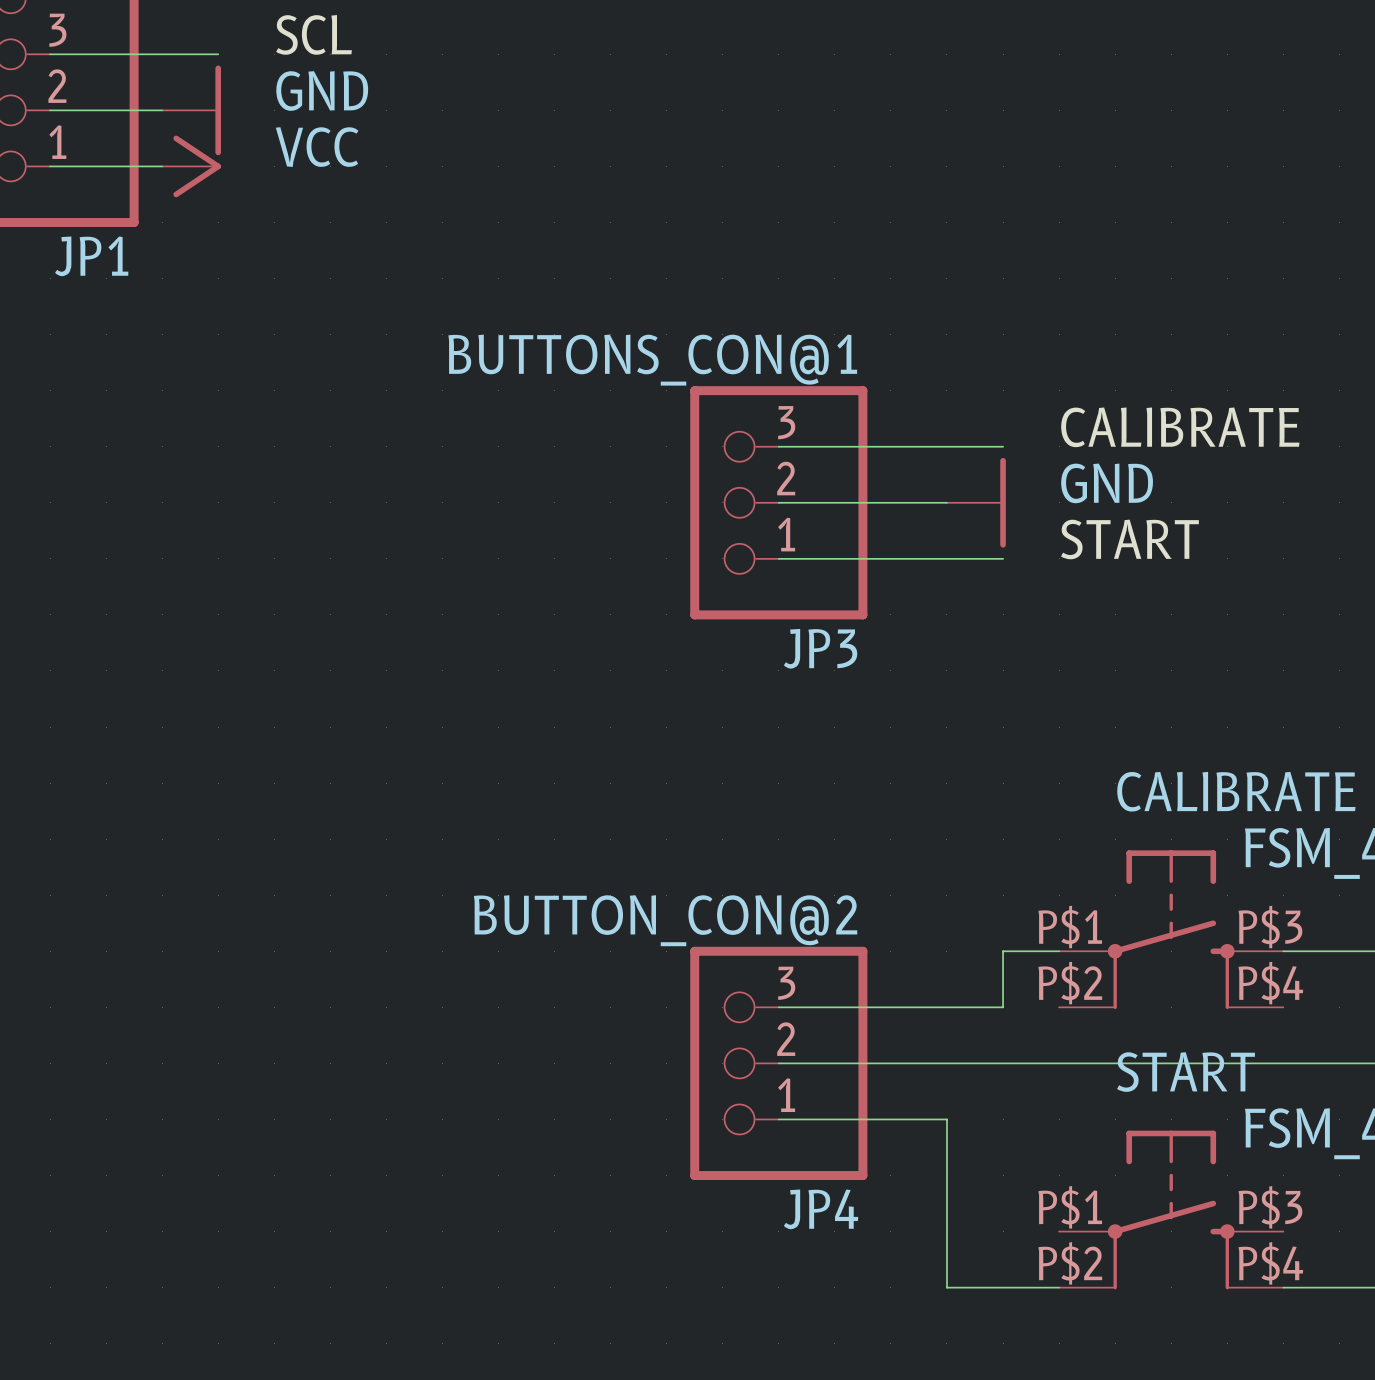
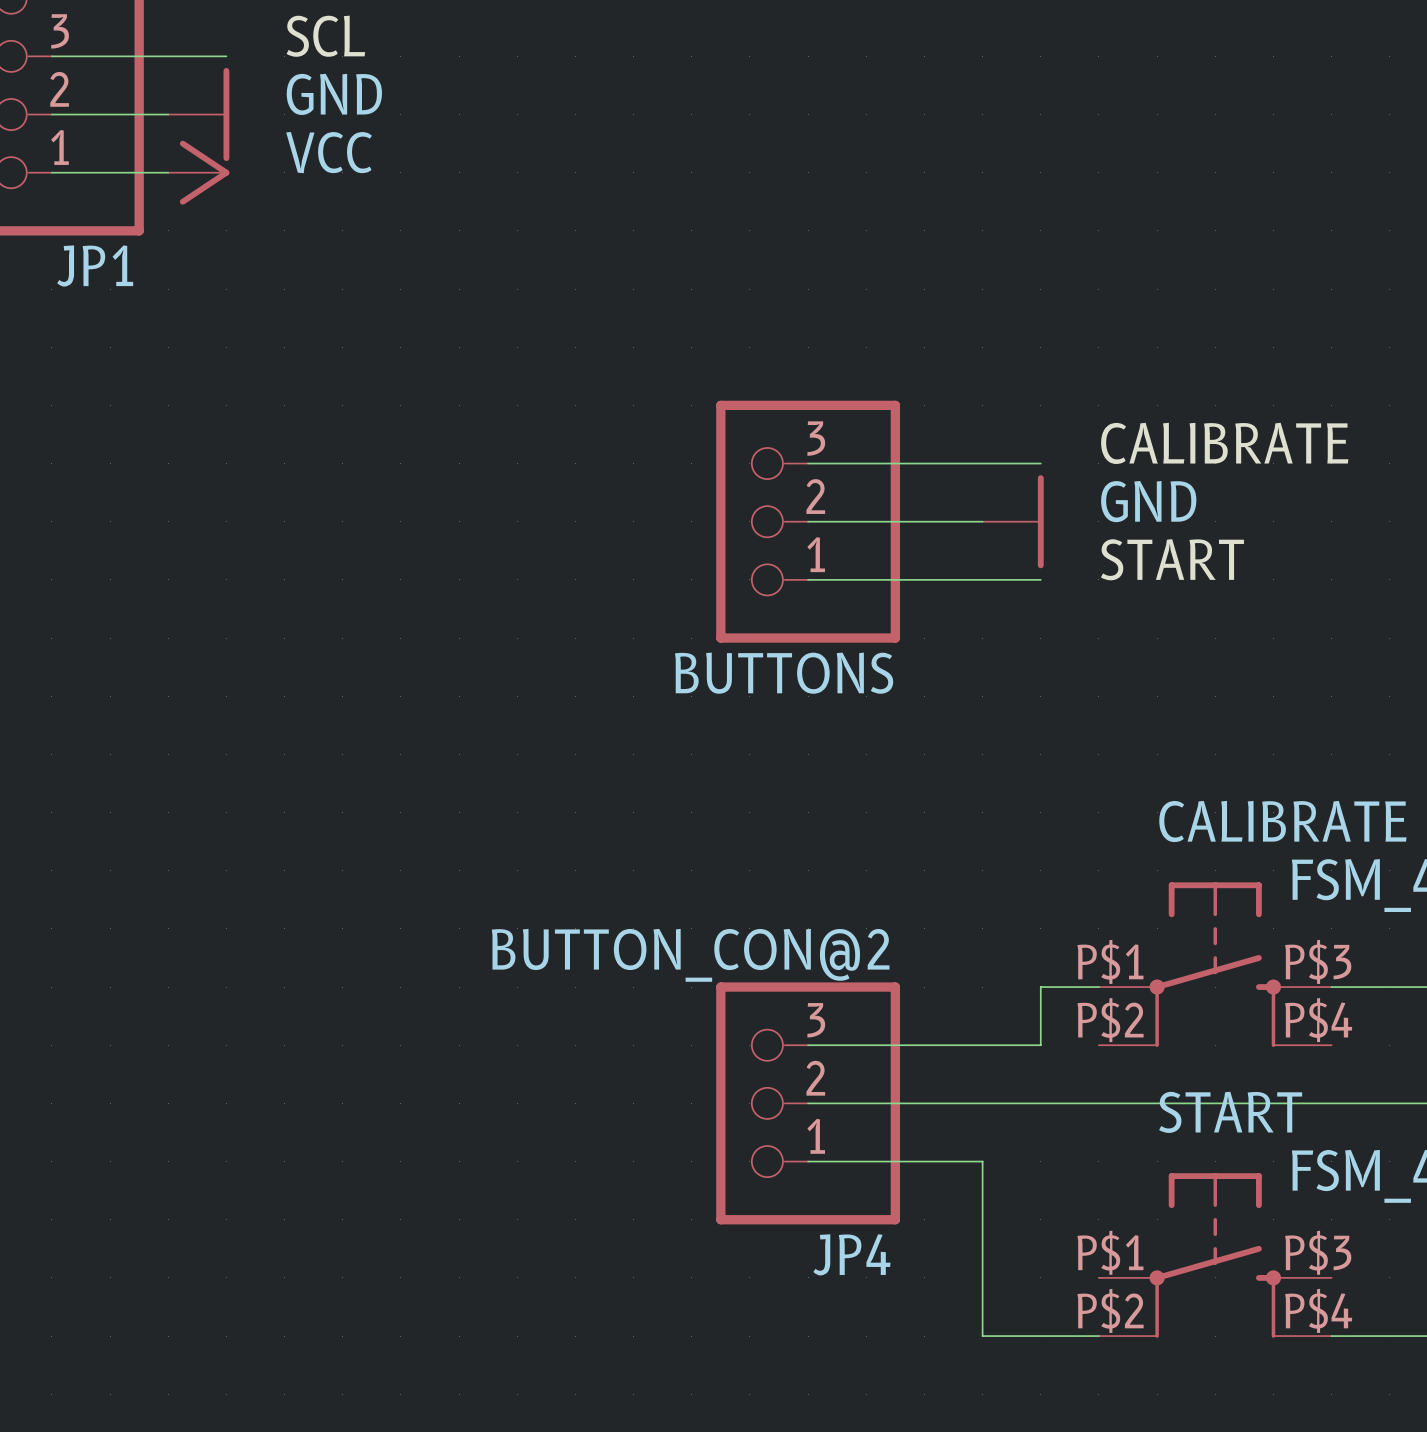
JP3 value: BUTTONS_CON@1 (652, 360) -> none
JP3 name: JP3 (820, 648) -> BUTTONS (784, 673)

